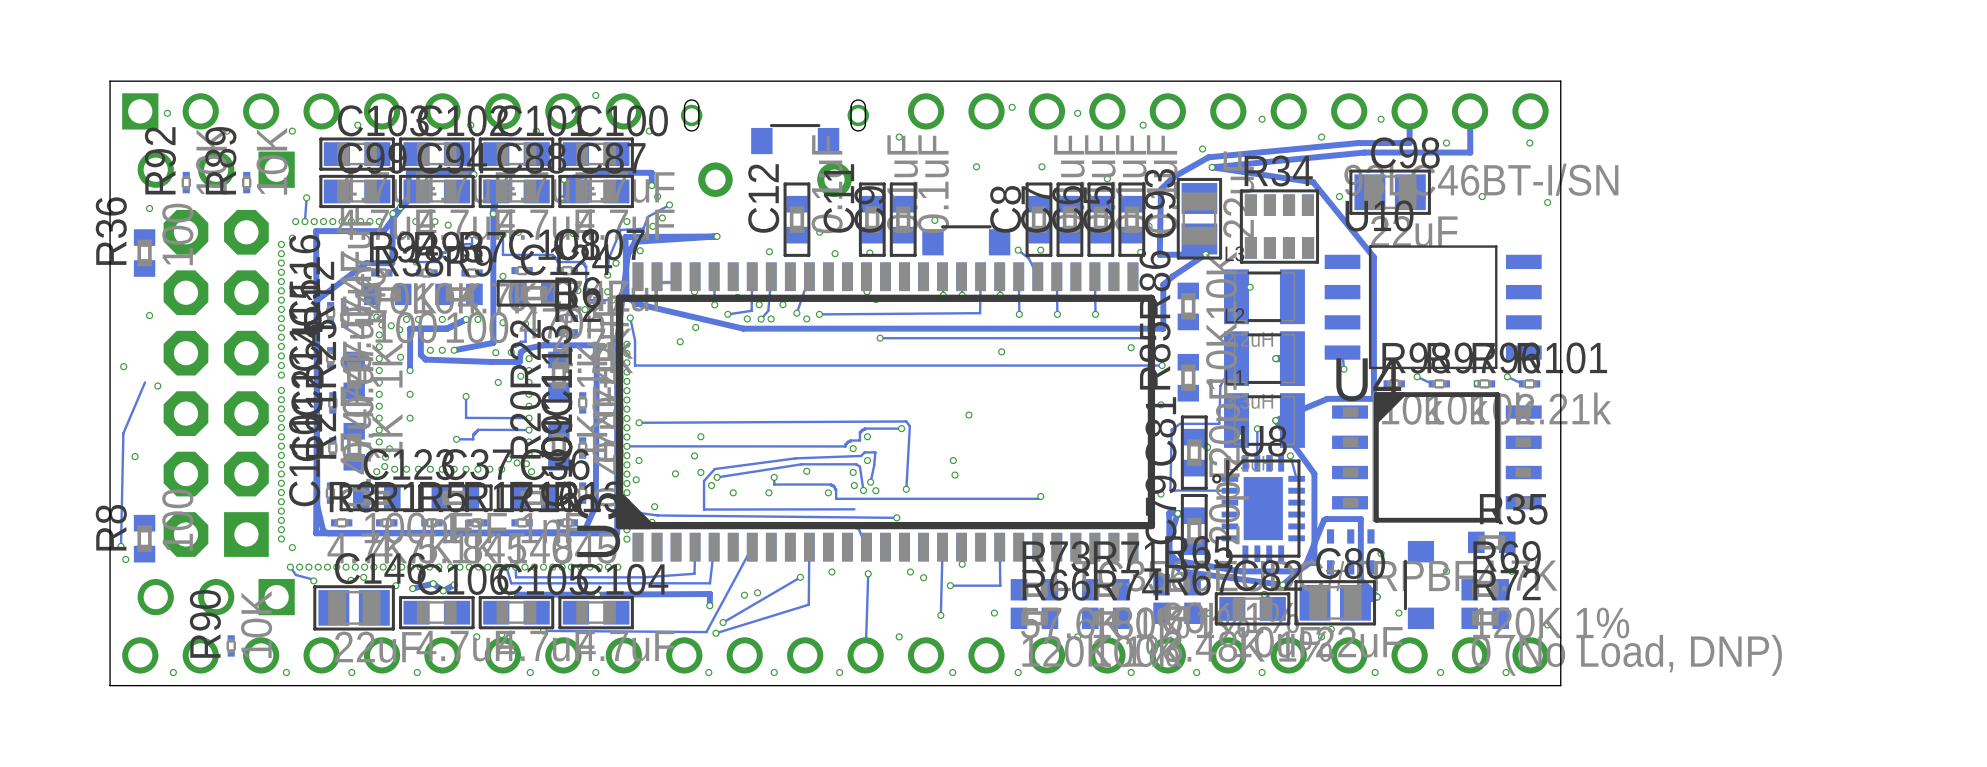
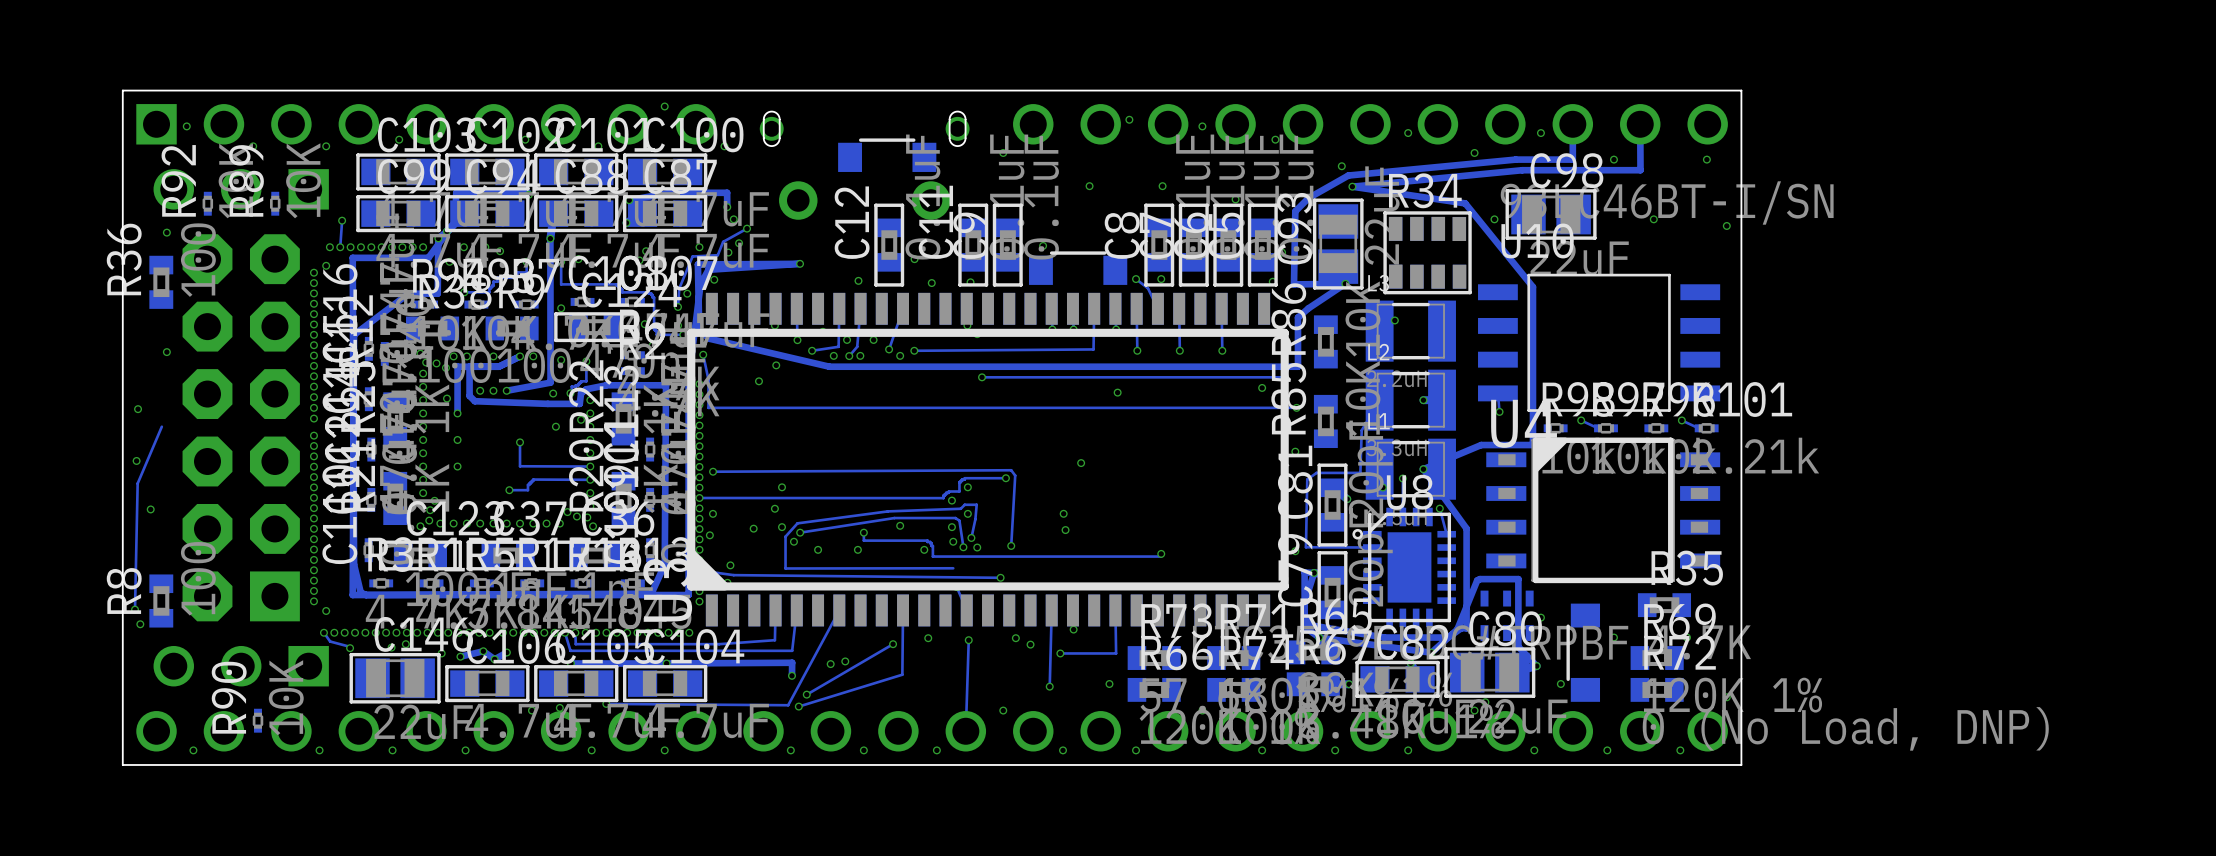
via: (1477, 383) -> none
via position: (157, 386) -> (136, 460)

